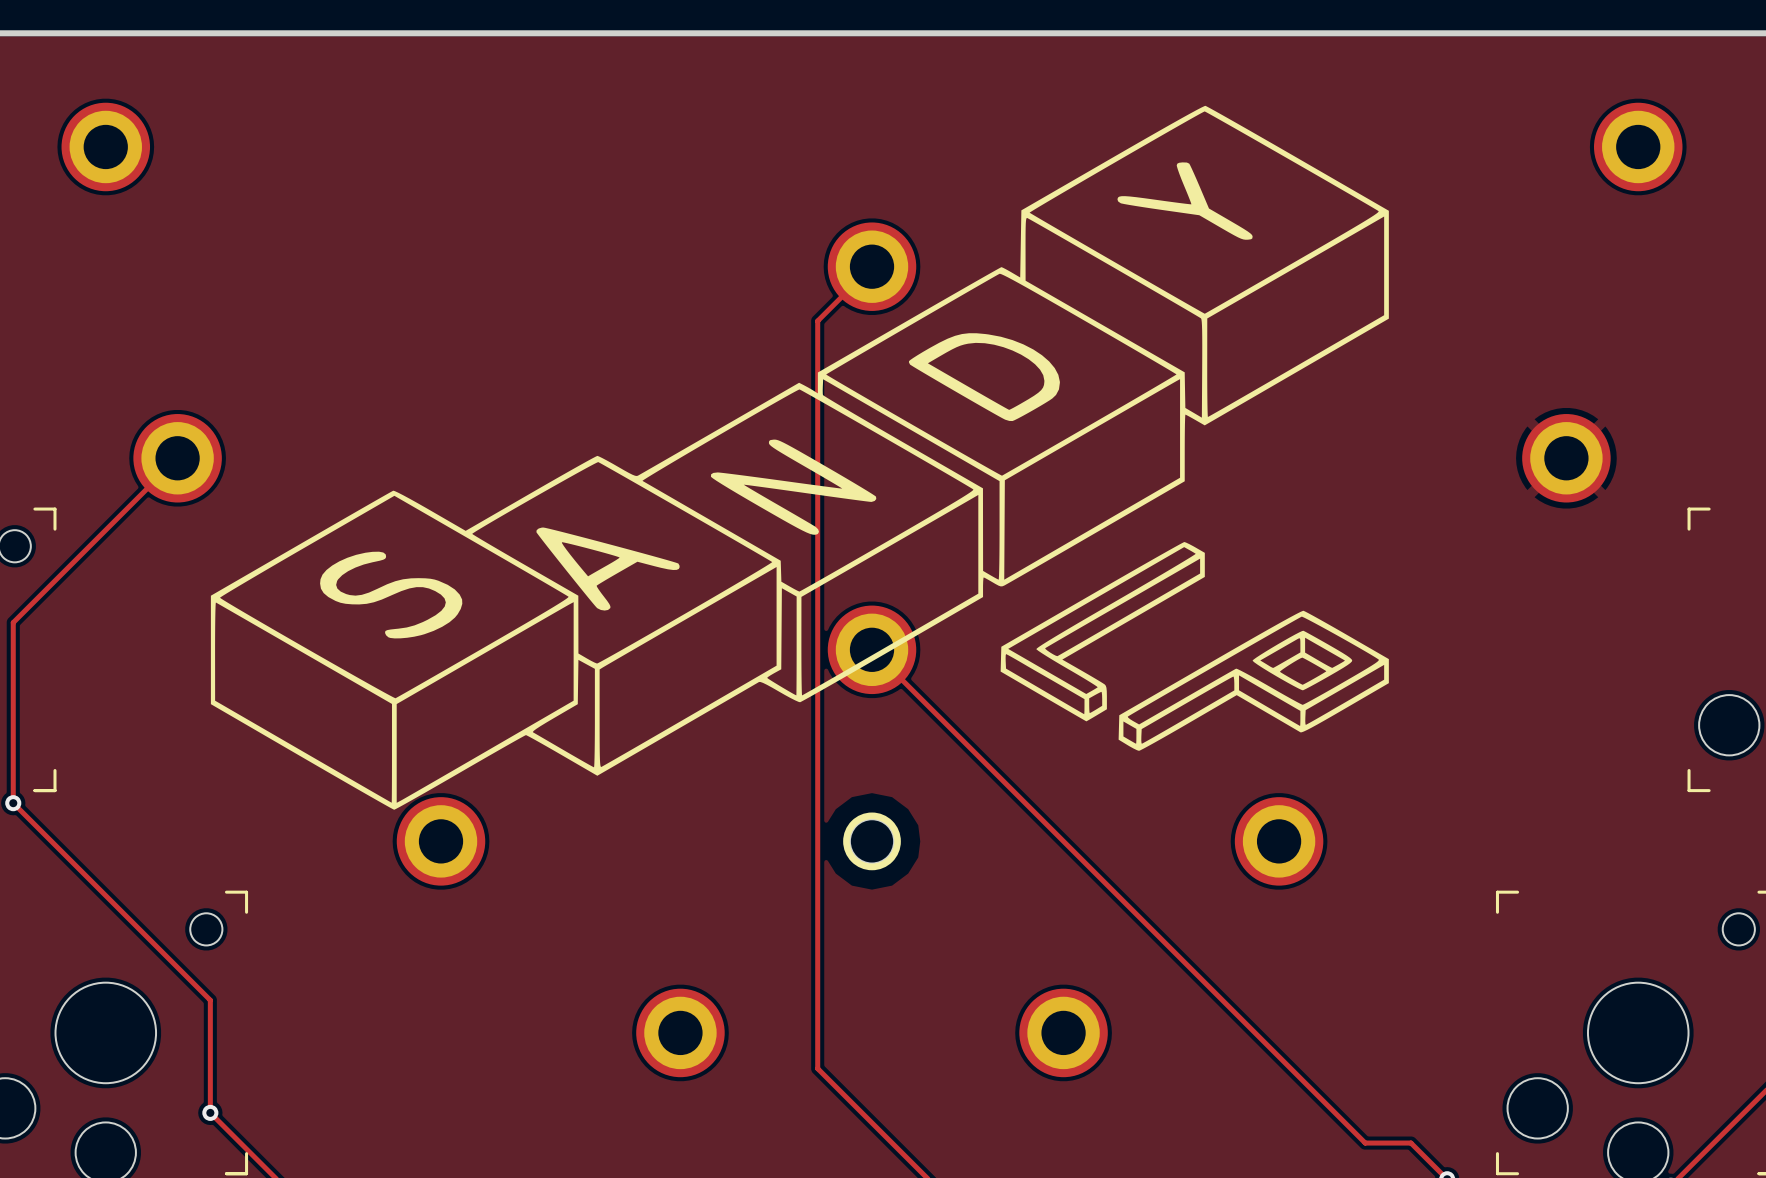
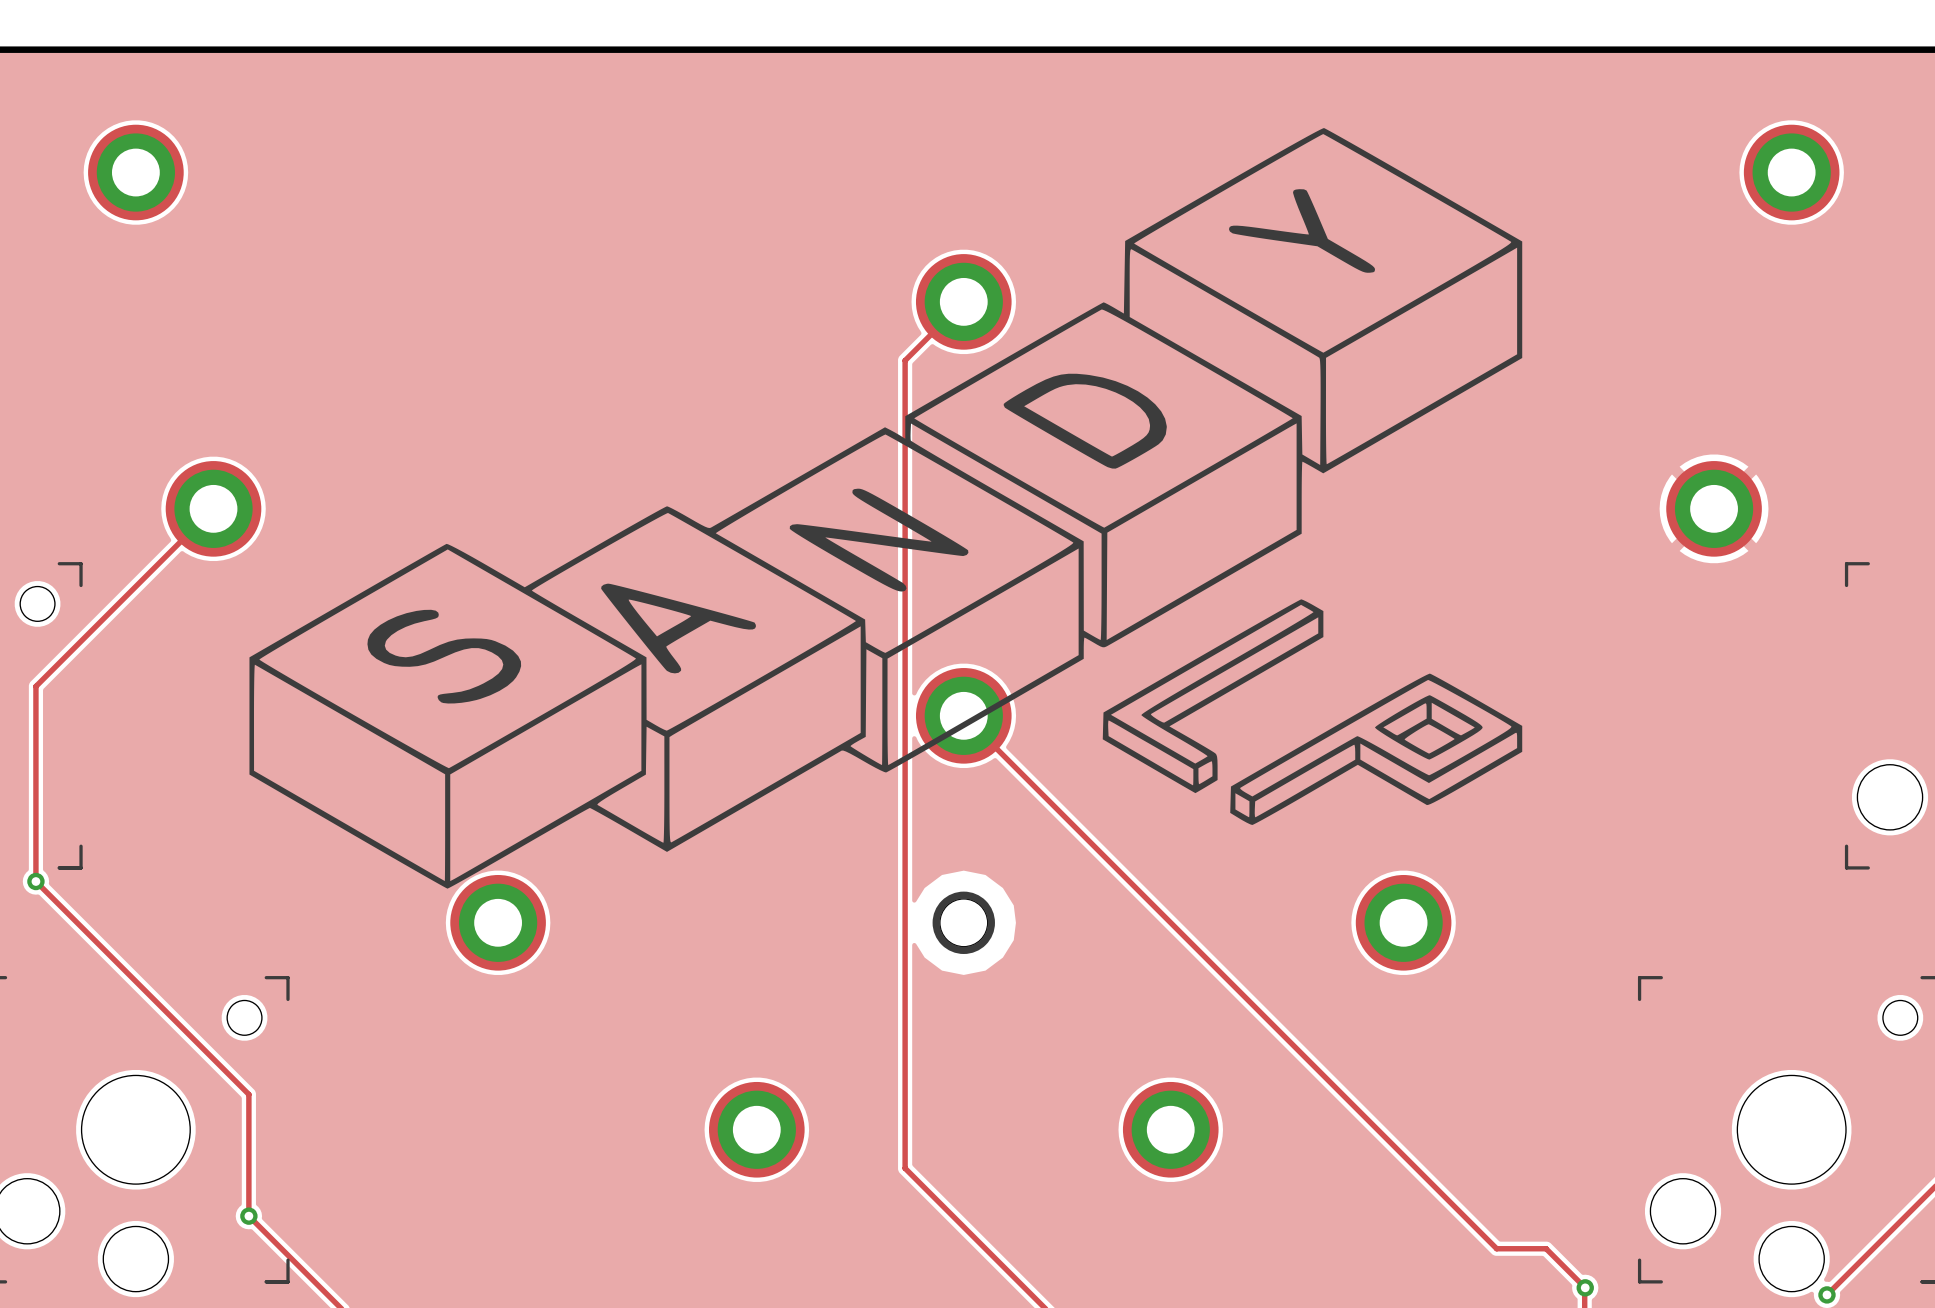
drawing shape: [210, 105, 1389, 810] -> [249, 128, 1523, 889]

